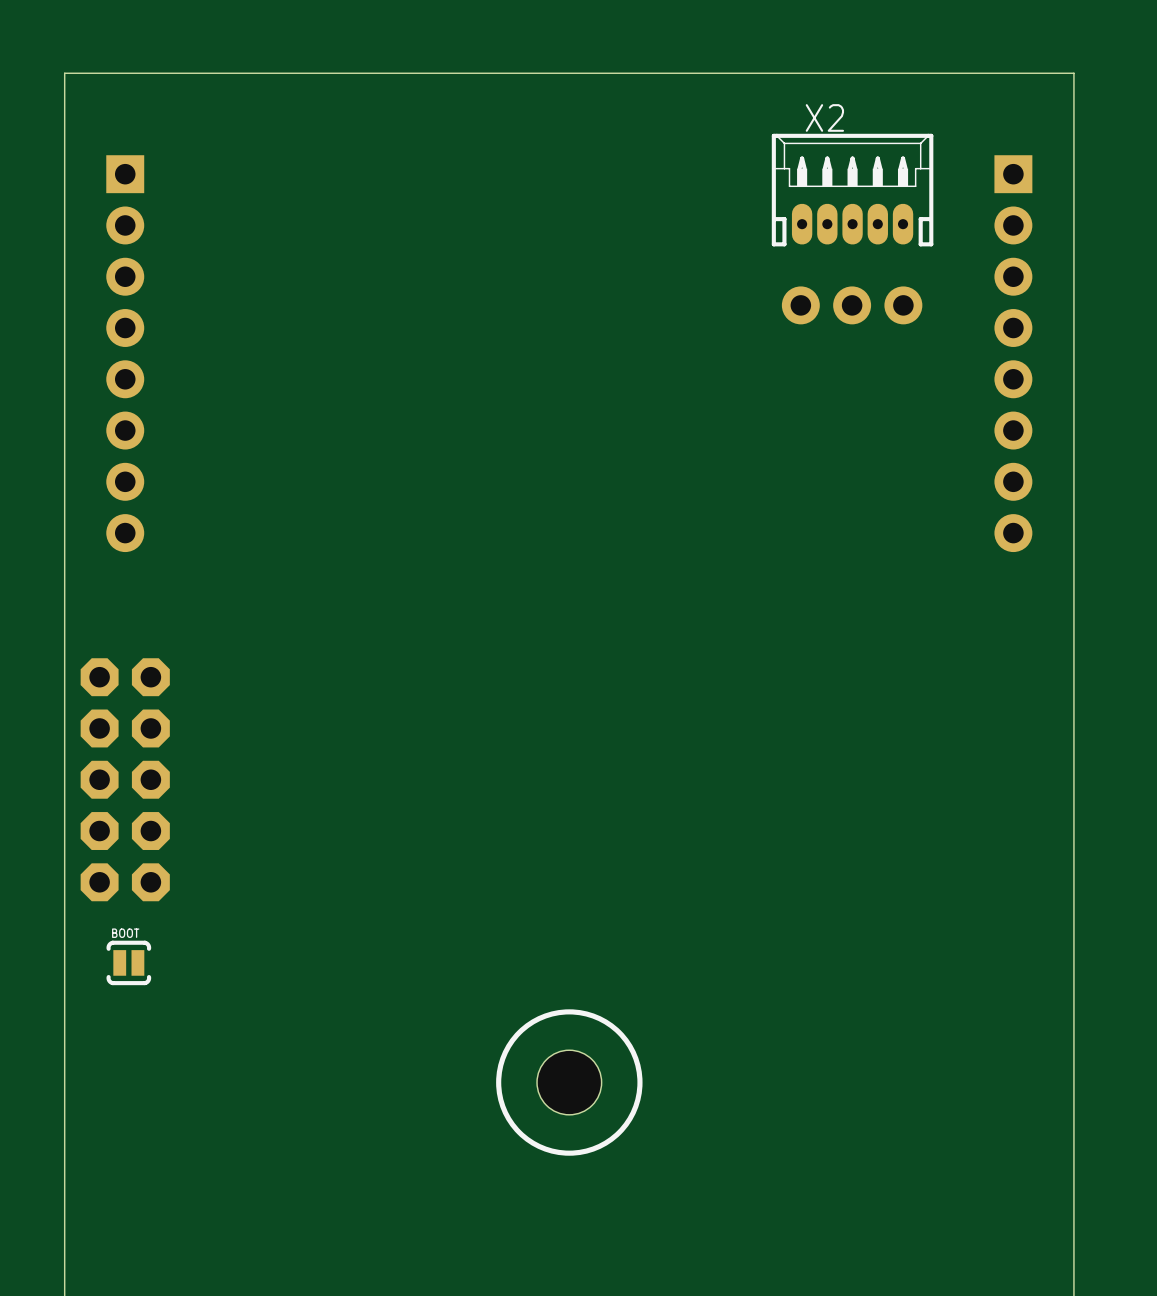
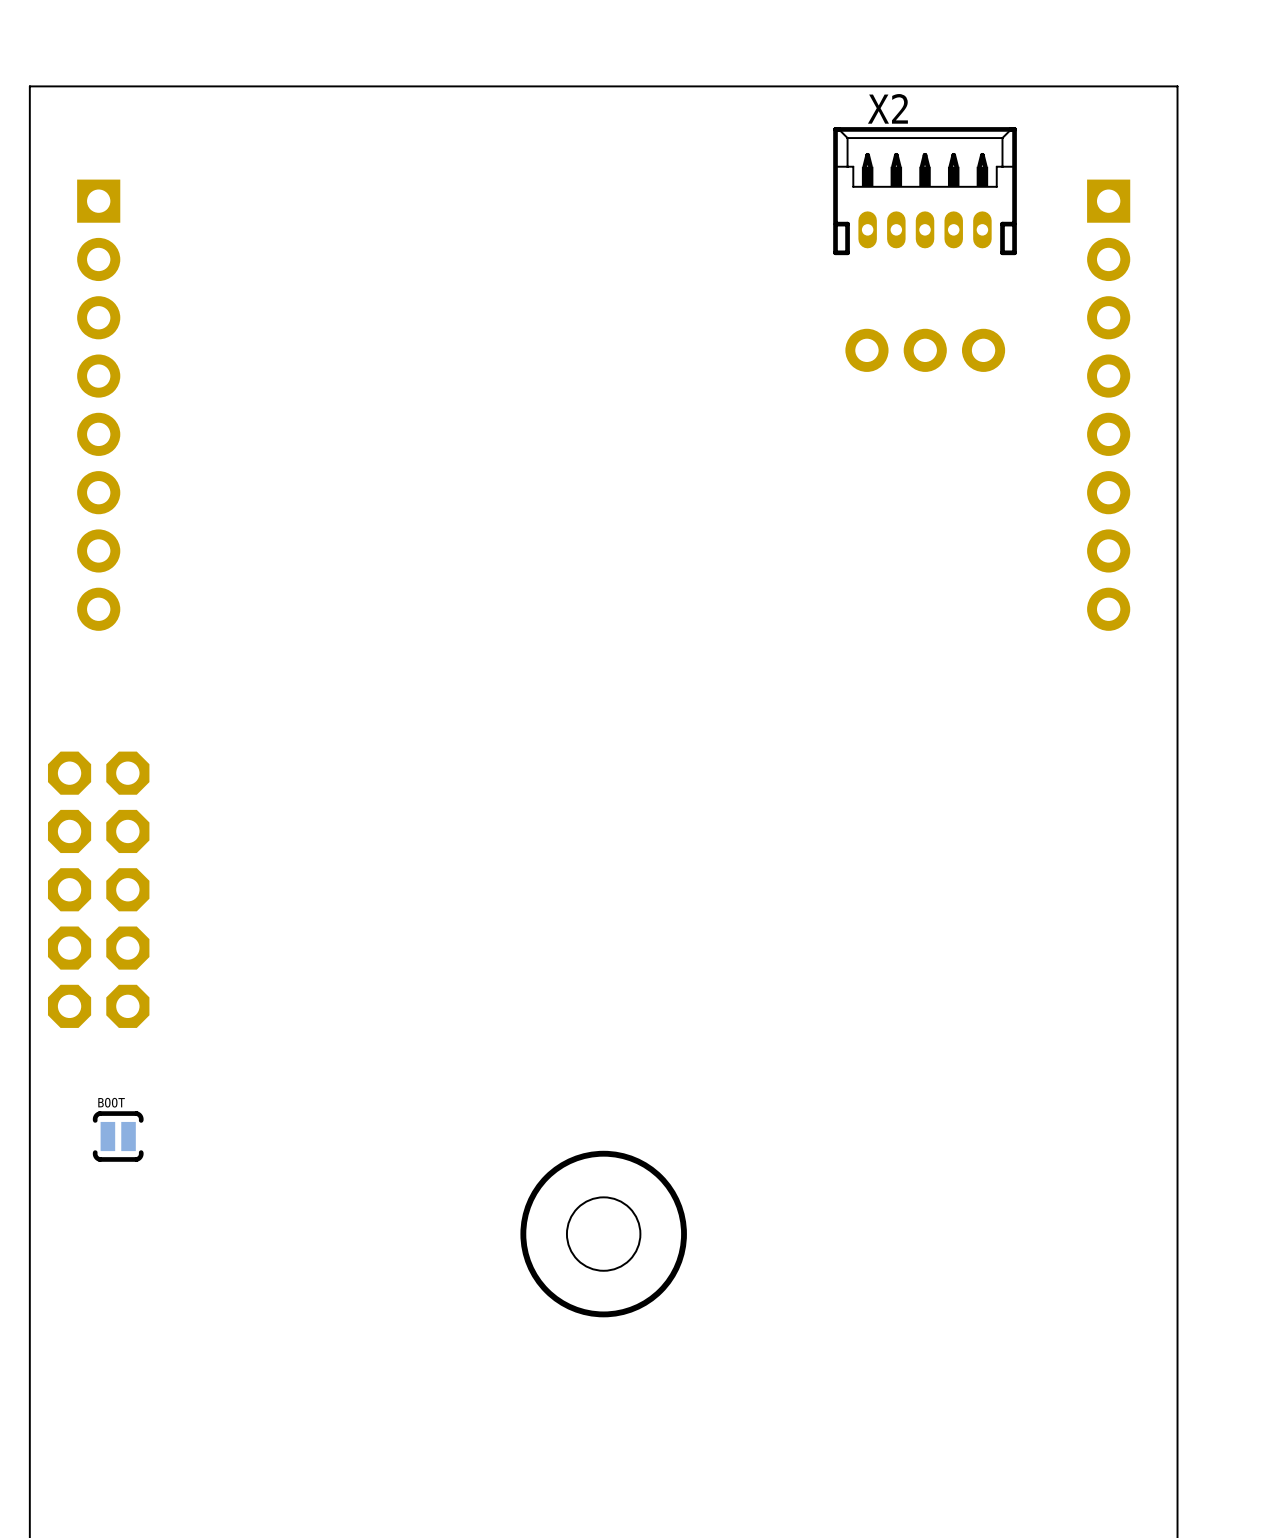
X2 footprint: [771, 133, 934, 247] -> [833, 127, 1017, 256]
BOOT position: (128, 962) -> (118, 1136)

